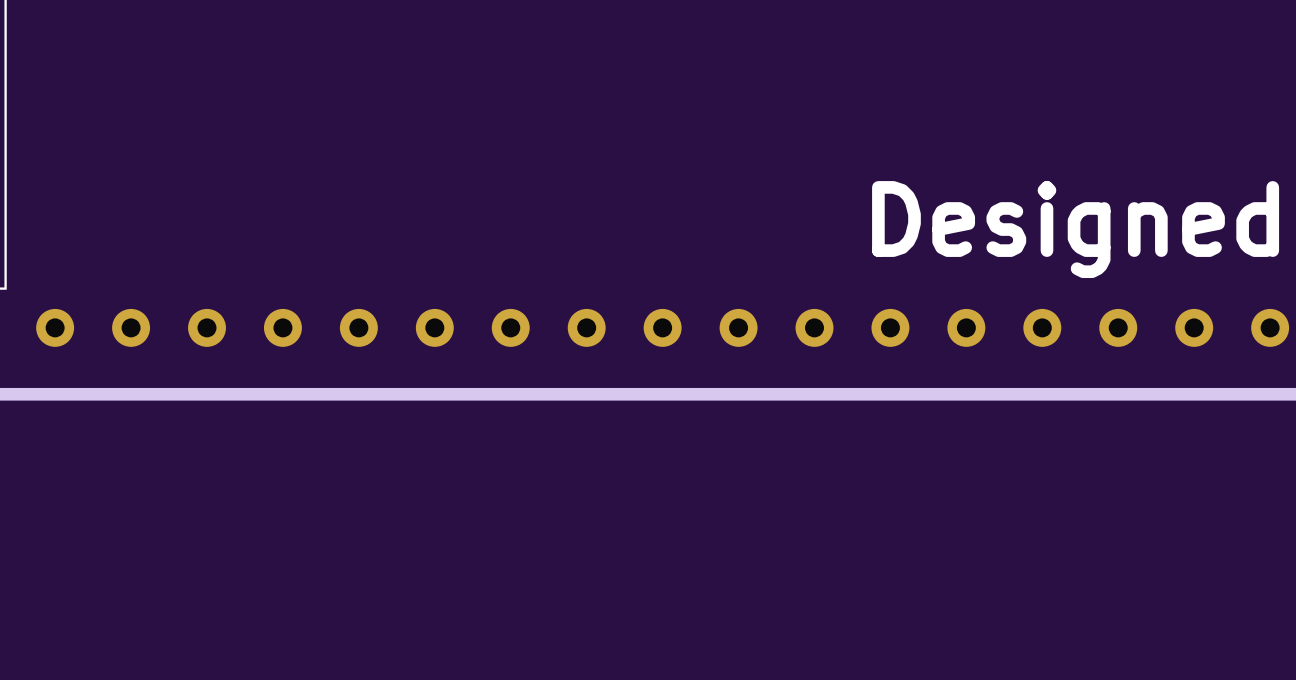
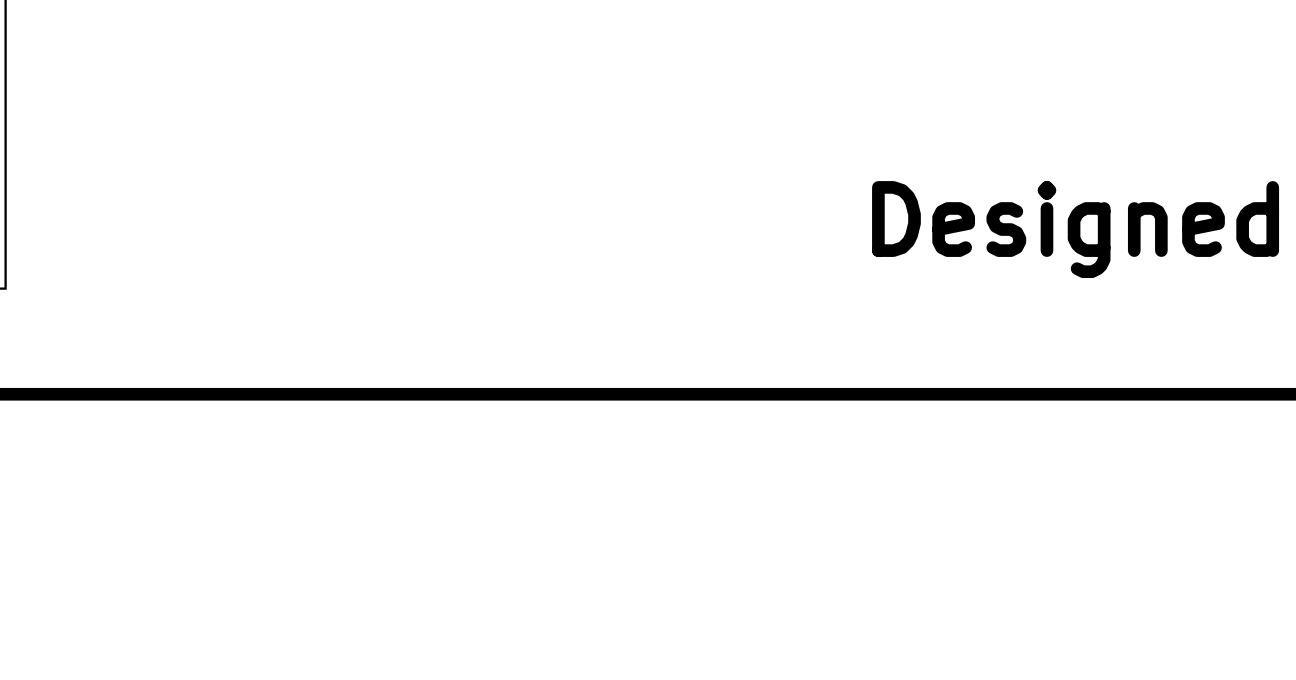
via: (55, 327) -> none
via: (131, 327) -> none
via: (207, 327) -> none
via: (282, 327) -> none
via: (358, 327) -> none
via: (434, 327) -> none
via: (510, 327) -> none
via: (586, 327) -> none
via: (662, 327) -> none
via: (738, 327) -> none
via: (814, 327) -> none
via: (890, 327) -> none
via: (966, 327) -> none
via: (1042, 327) -> none
via: (1118, 327) -> none
via: (1194, 327) -> none
via: (1270, 327) -> none

